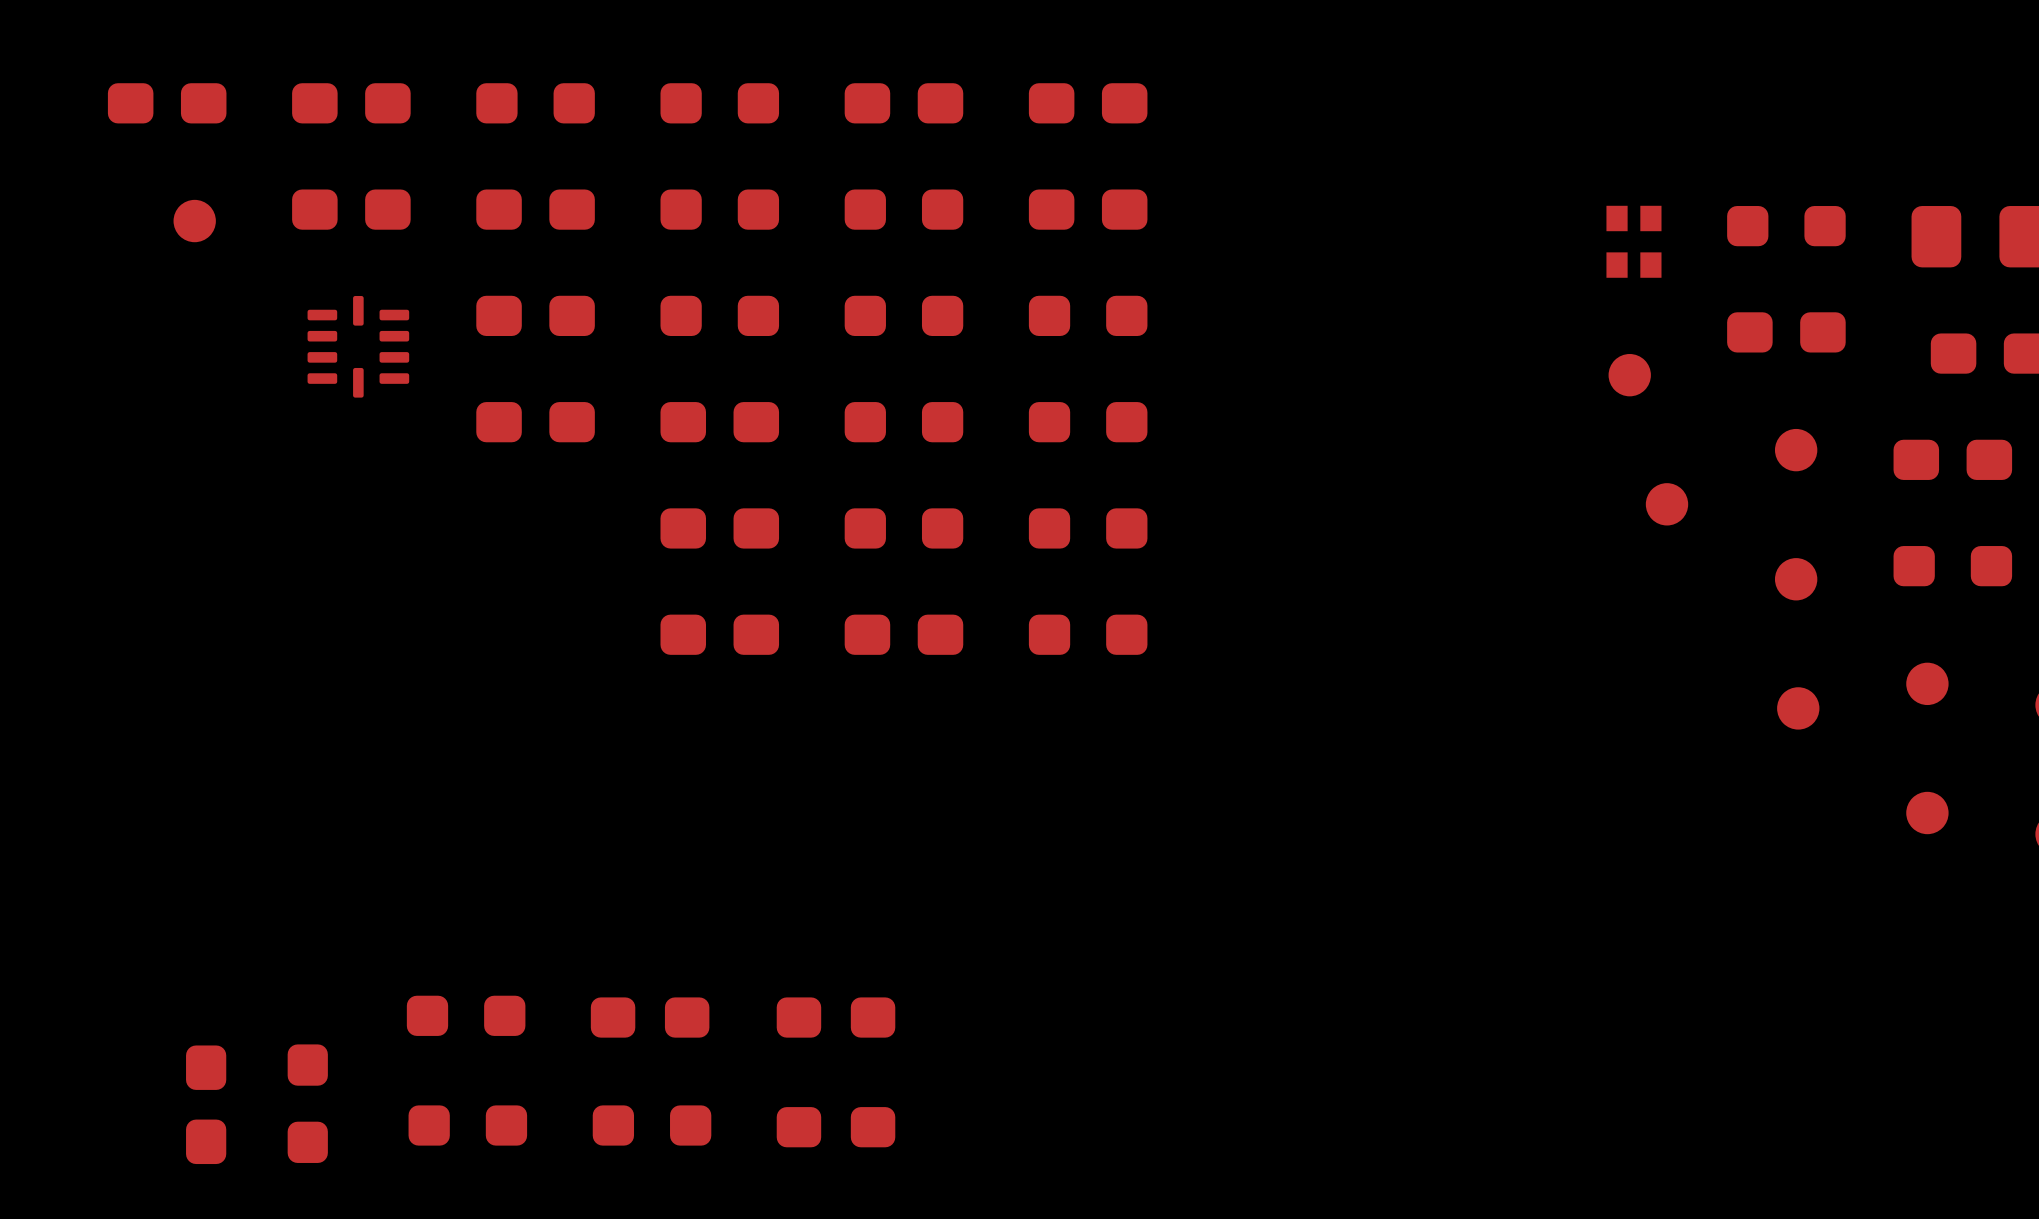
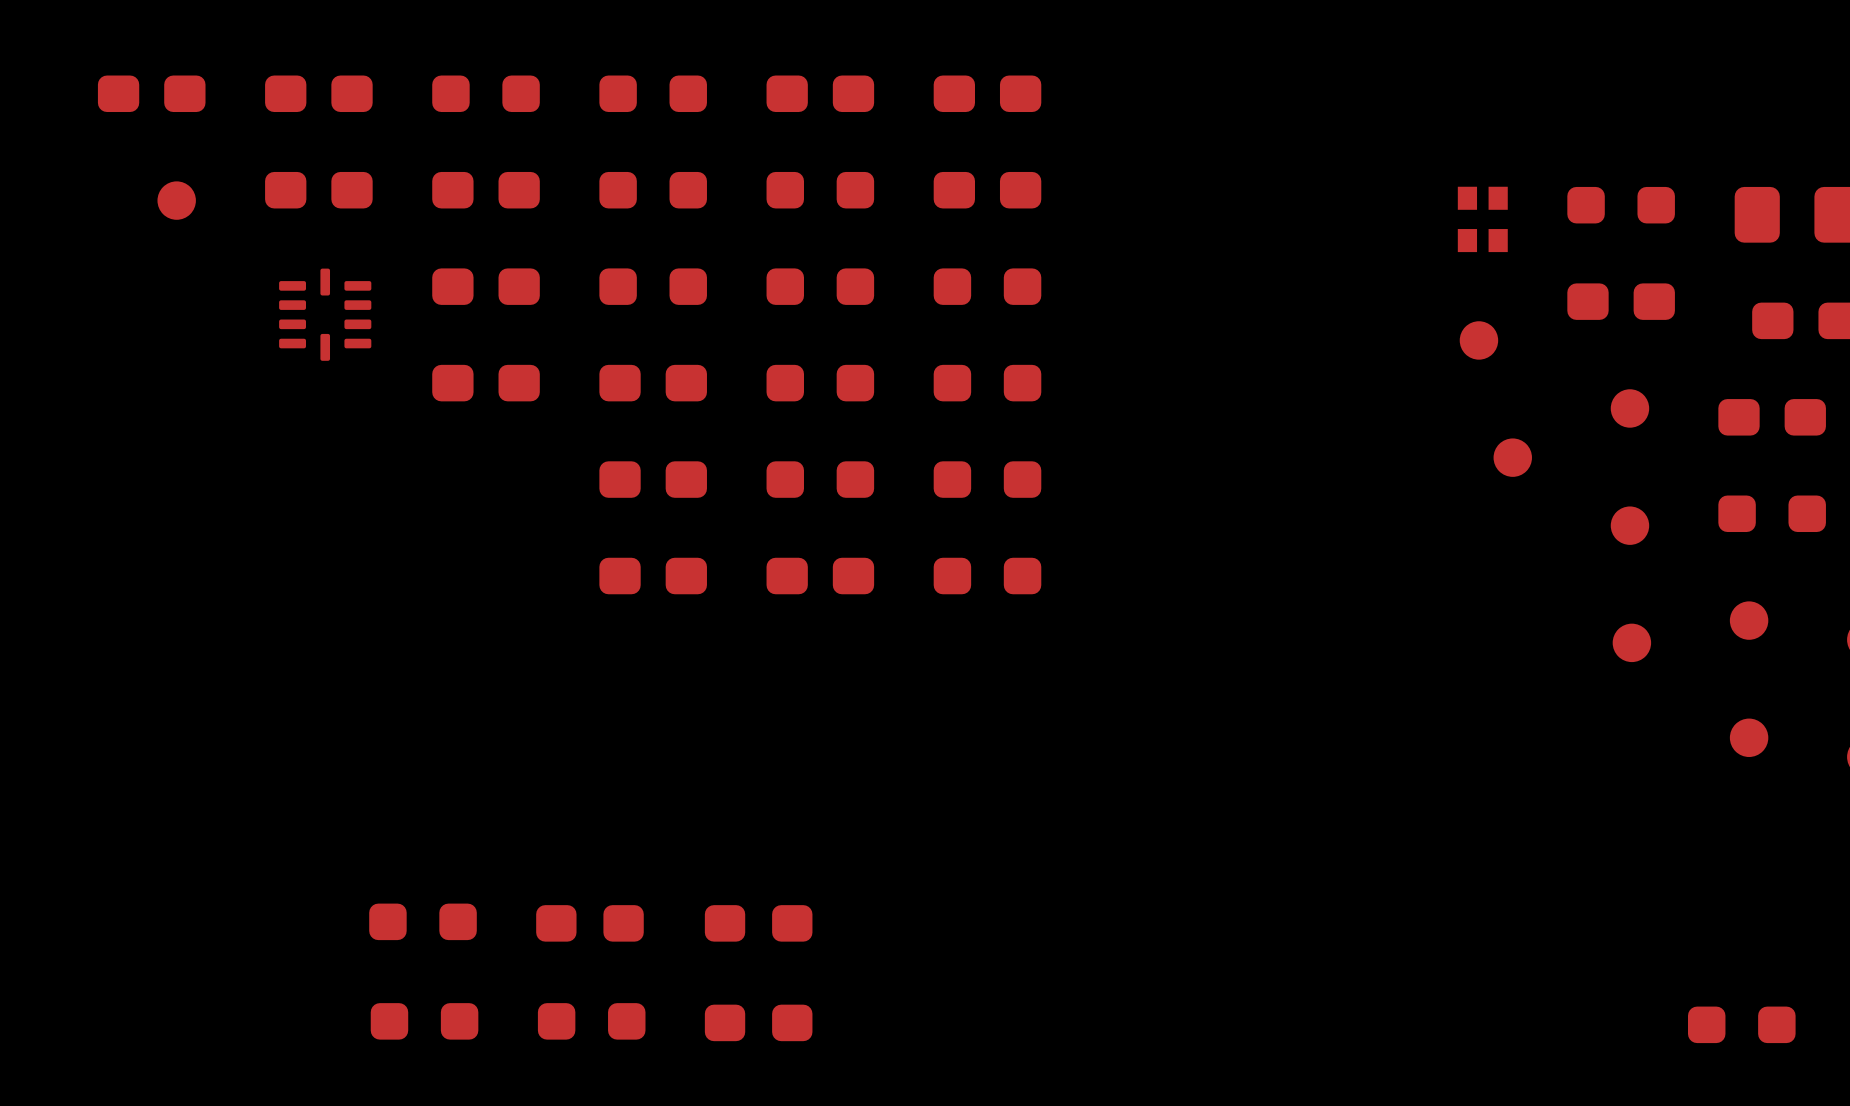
part: (307, 1103) -> none
part: (206, 1104) -> none
part: none -> (1741, 1024)

